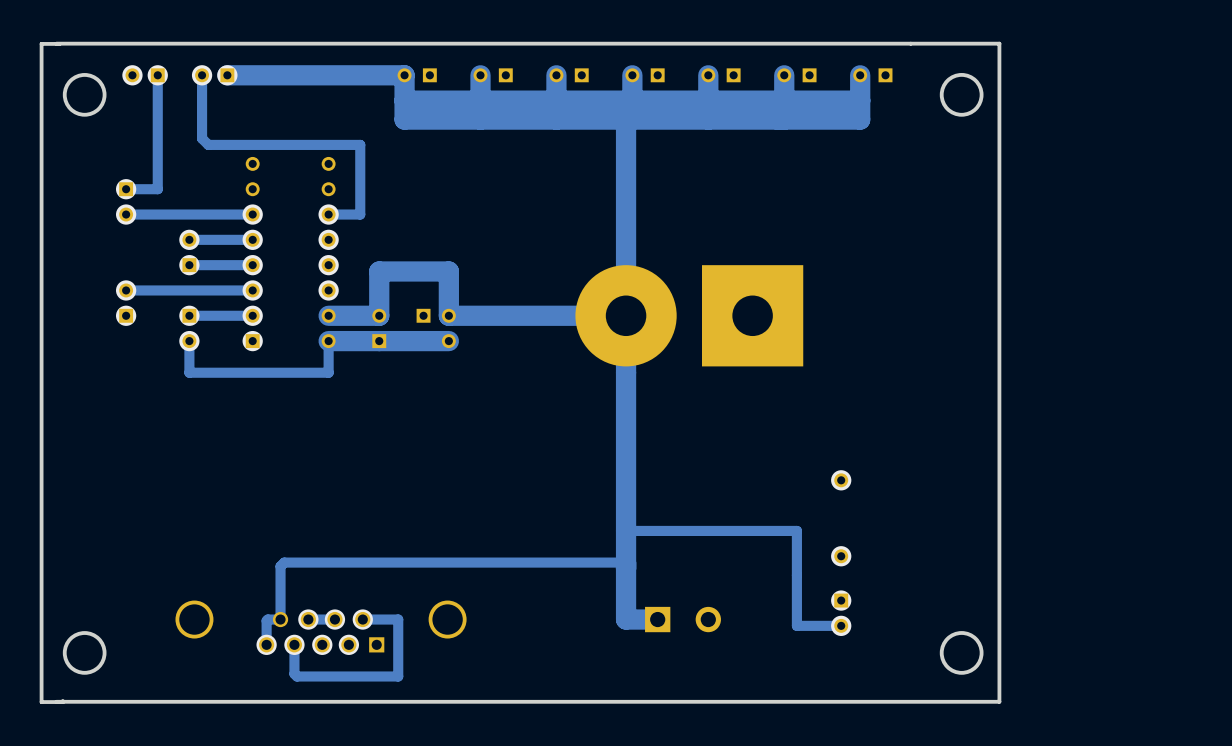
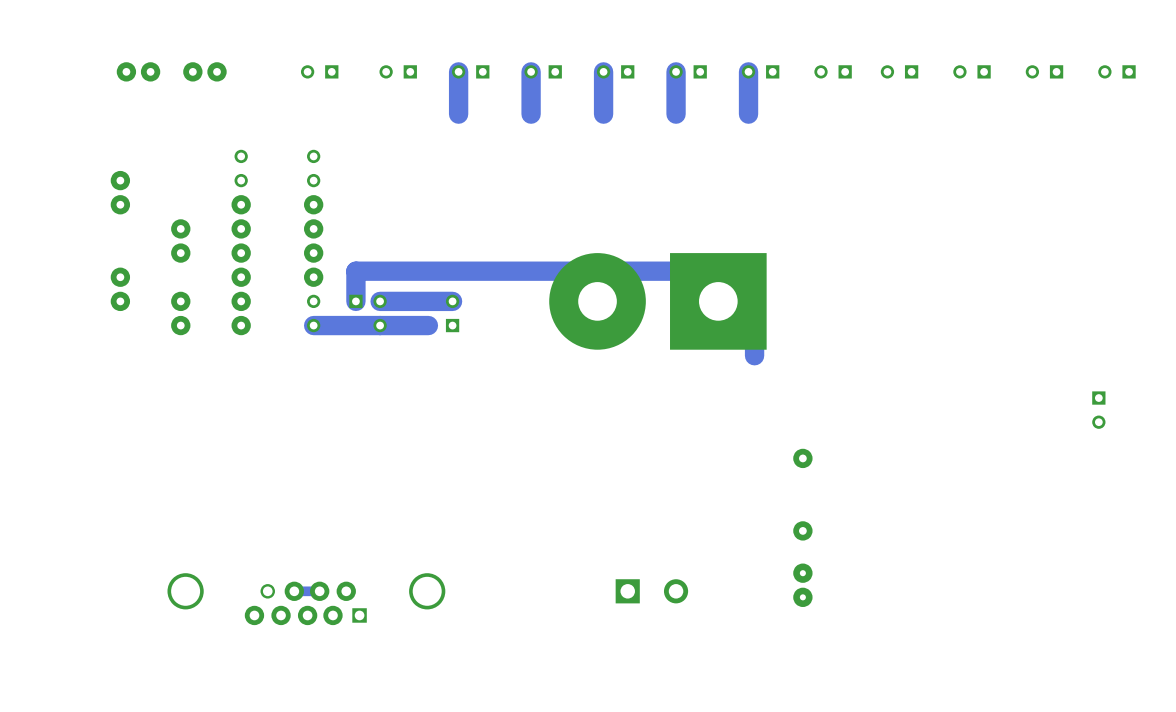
board edge: (56, 43) (999, 43) (999, 701) (56, 701) -> none
board edge: (59, 43) (41, 43) (41, 702) (62, 701) -> none
round board edge: [62, 73, 107, 117] -> none
round board edge: [939, 73, 984, 117] -> none
track: (157, 75) (157, 189) (126, 189) -> none
track: (202, 75) (202, 138) (208, 144) (360, 144) (360, 214) (328, 214) -> none
part: none -> (319, 71)
track: (860, 75) (860, 119) (404, 119) (404, 75) (227, 75) -> none
part: none -> (899, 71)
part: none -> (972, 71)
part: none -> (1044, 71)
part: none -> (1116, 71)
track: (860, 100) (404, 100) -> none
track: (626, 119) (626, 619) (657, 619) -> none
track: (252, 214) (126, 214) -> none
track: (252, 239) (189, 239) -> none
track: (252, 265) (189, 265) -> none
track: (252, 290) (126, 290) -> none
part footprint: [372, 308, 387, 349] -> [349, 294, 387, 333]
track: (252, 315) (189, 315) -> none
track: none -> (355, 301) (355, 271) (754, 271) (754, 355)
track: (448, 315) (448, 271) (379, 271) (379, 315) (328, 315) -> (428, 301) (380, 301)
track: (626, 315) (474, 315) -> none
part: (436, 328) -> none
part: none -> (452, 313)
track: (328, 341) (328, 372) (189, 372) (189, 341) -> none
part: none -> (1098, 410)
track: (626, 530) (796, 530) (796, 625) (841, 625) -> none
track: (626, 562) (284, 562) (280, 566) (280, 619) (266, 620) (266, 644) -> none
part: (841, 613) -> none
track: (362, 619) (398, 619) (398, 676) (296, 676) (294, 673) (294, 644) -> none
round board edge: [62, 631, 107, 675] -> none
round board edge: [939, 631, 984, 675] -> none

